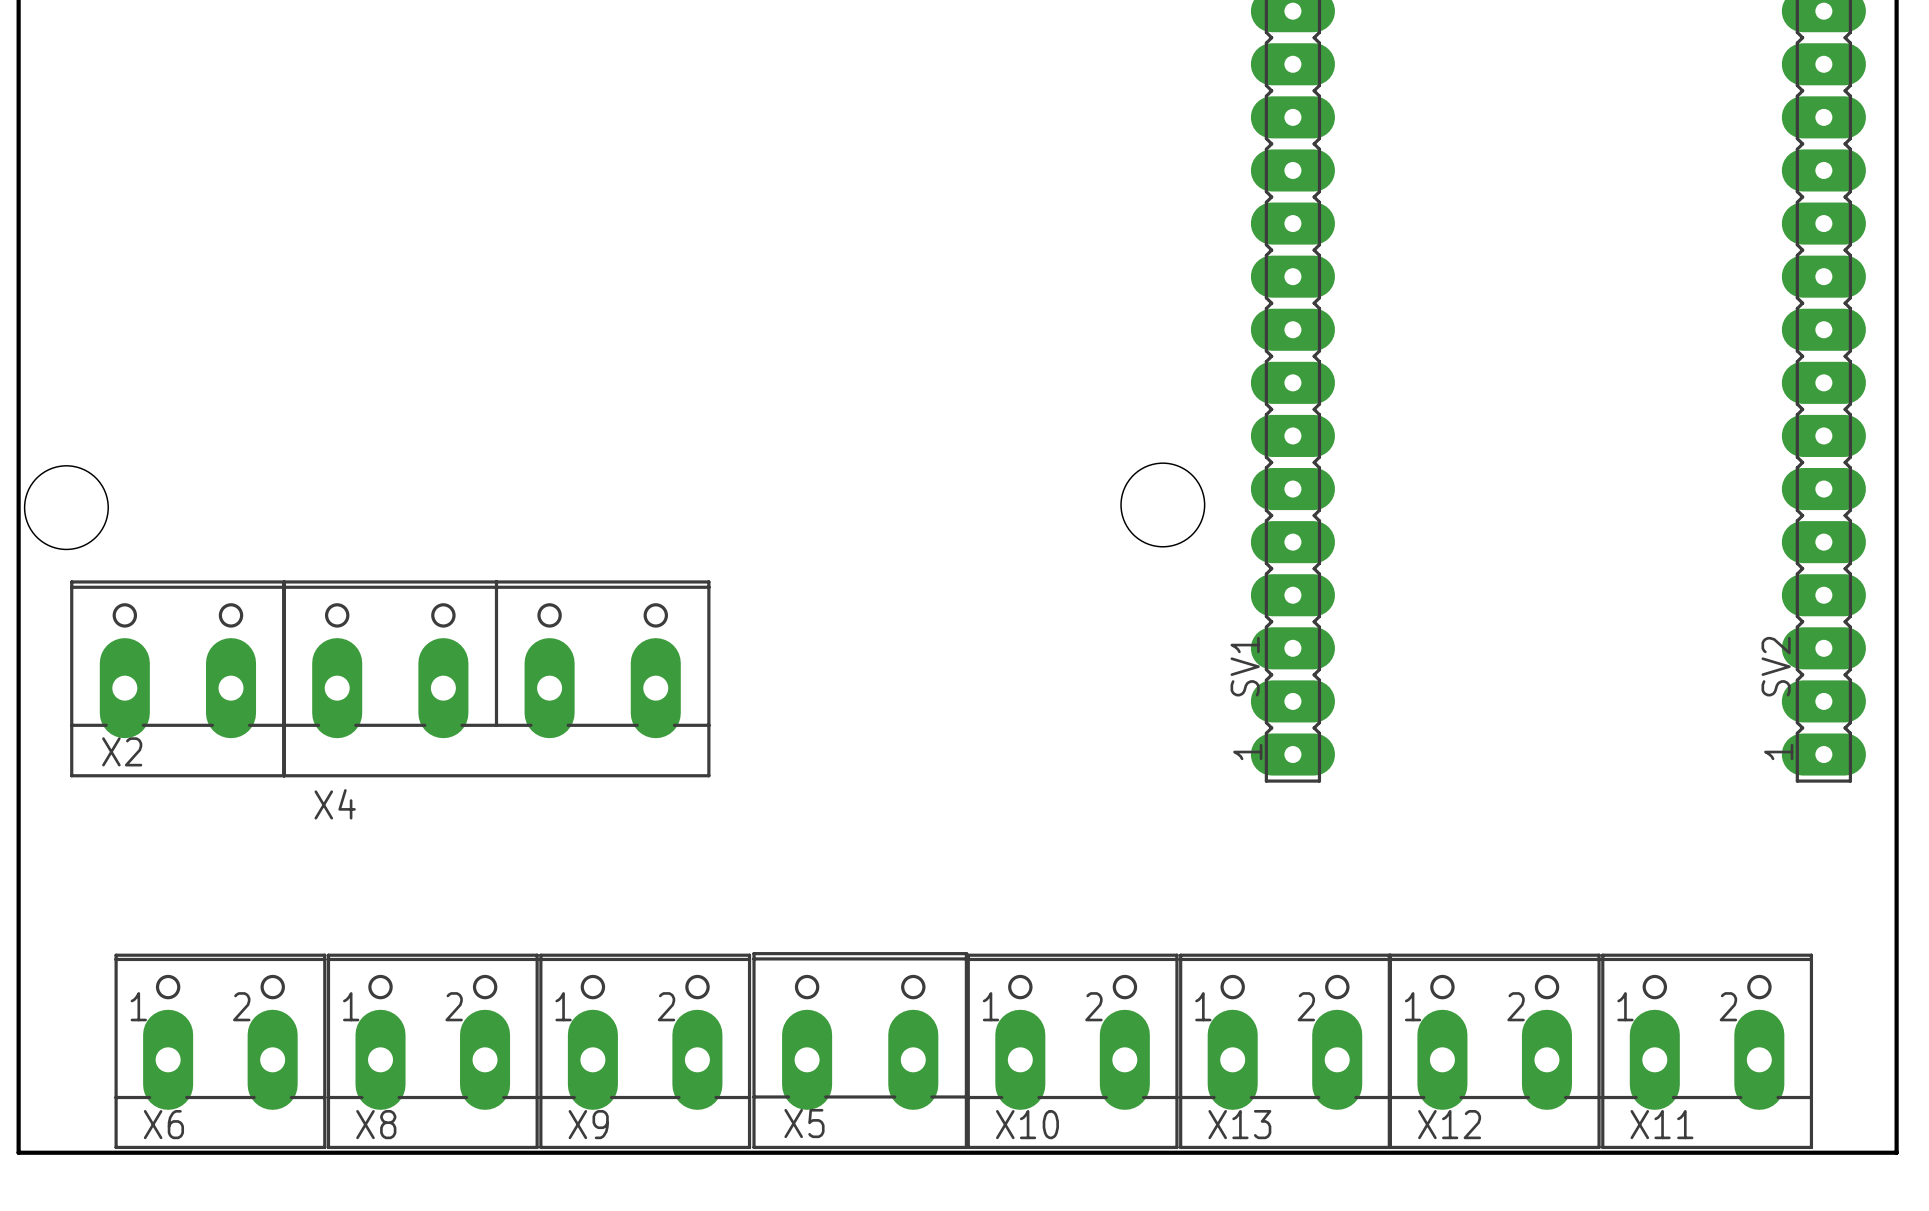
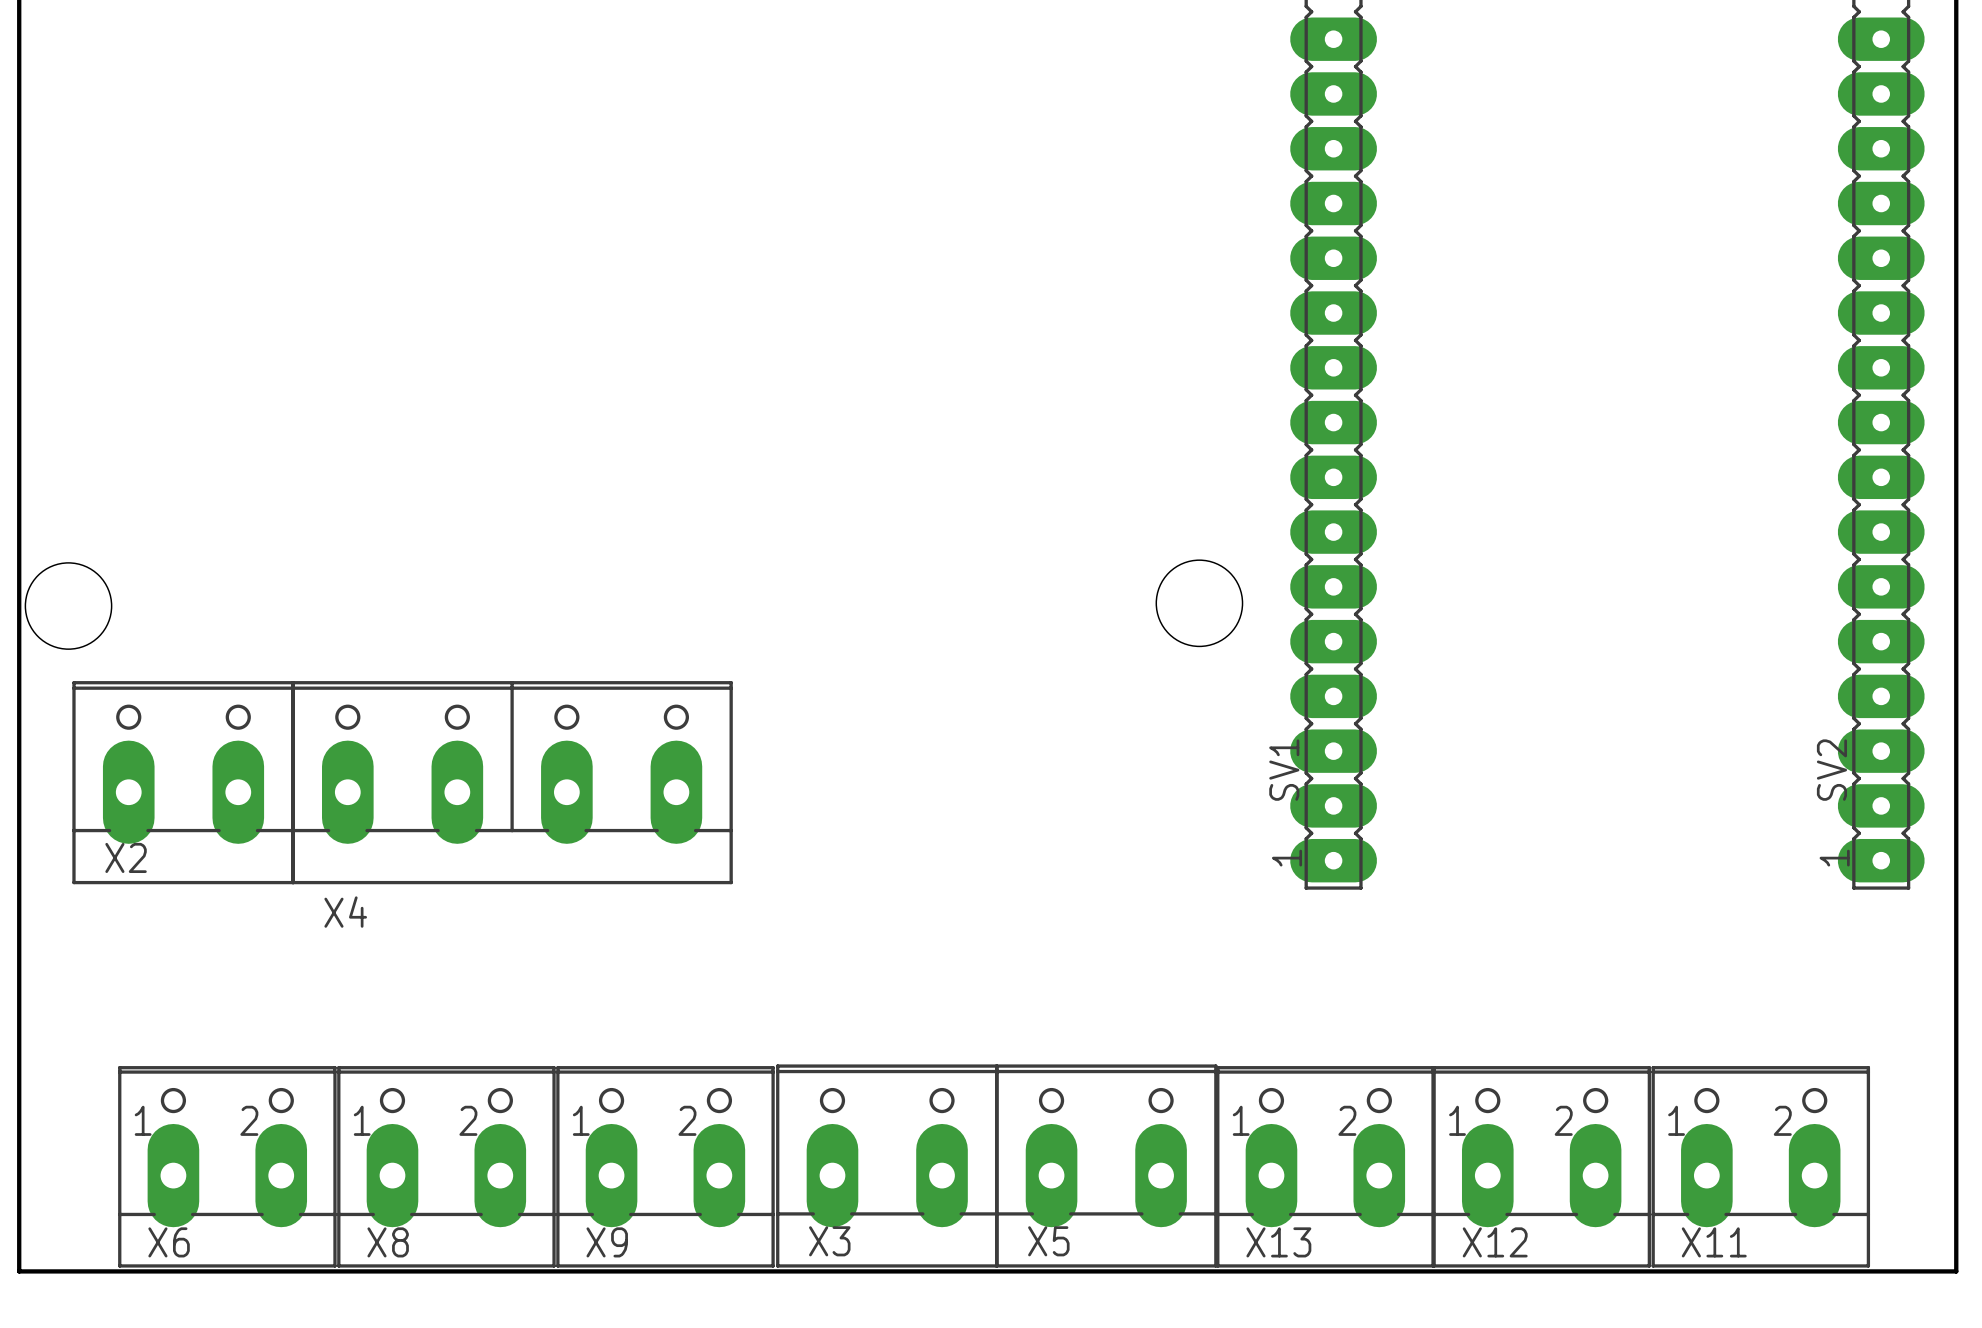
X5: none -> (1106, 1166)
X10: (1072, 1051) -> none
X5 name: X5 (804, 1123) -> X3 (829, 1241)

